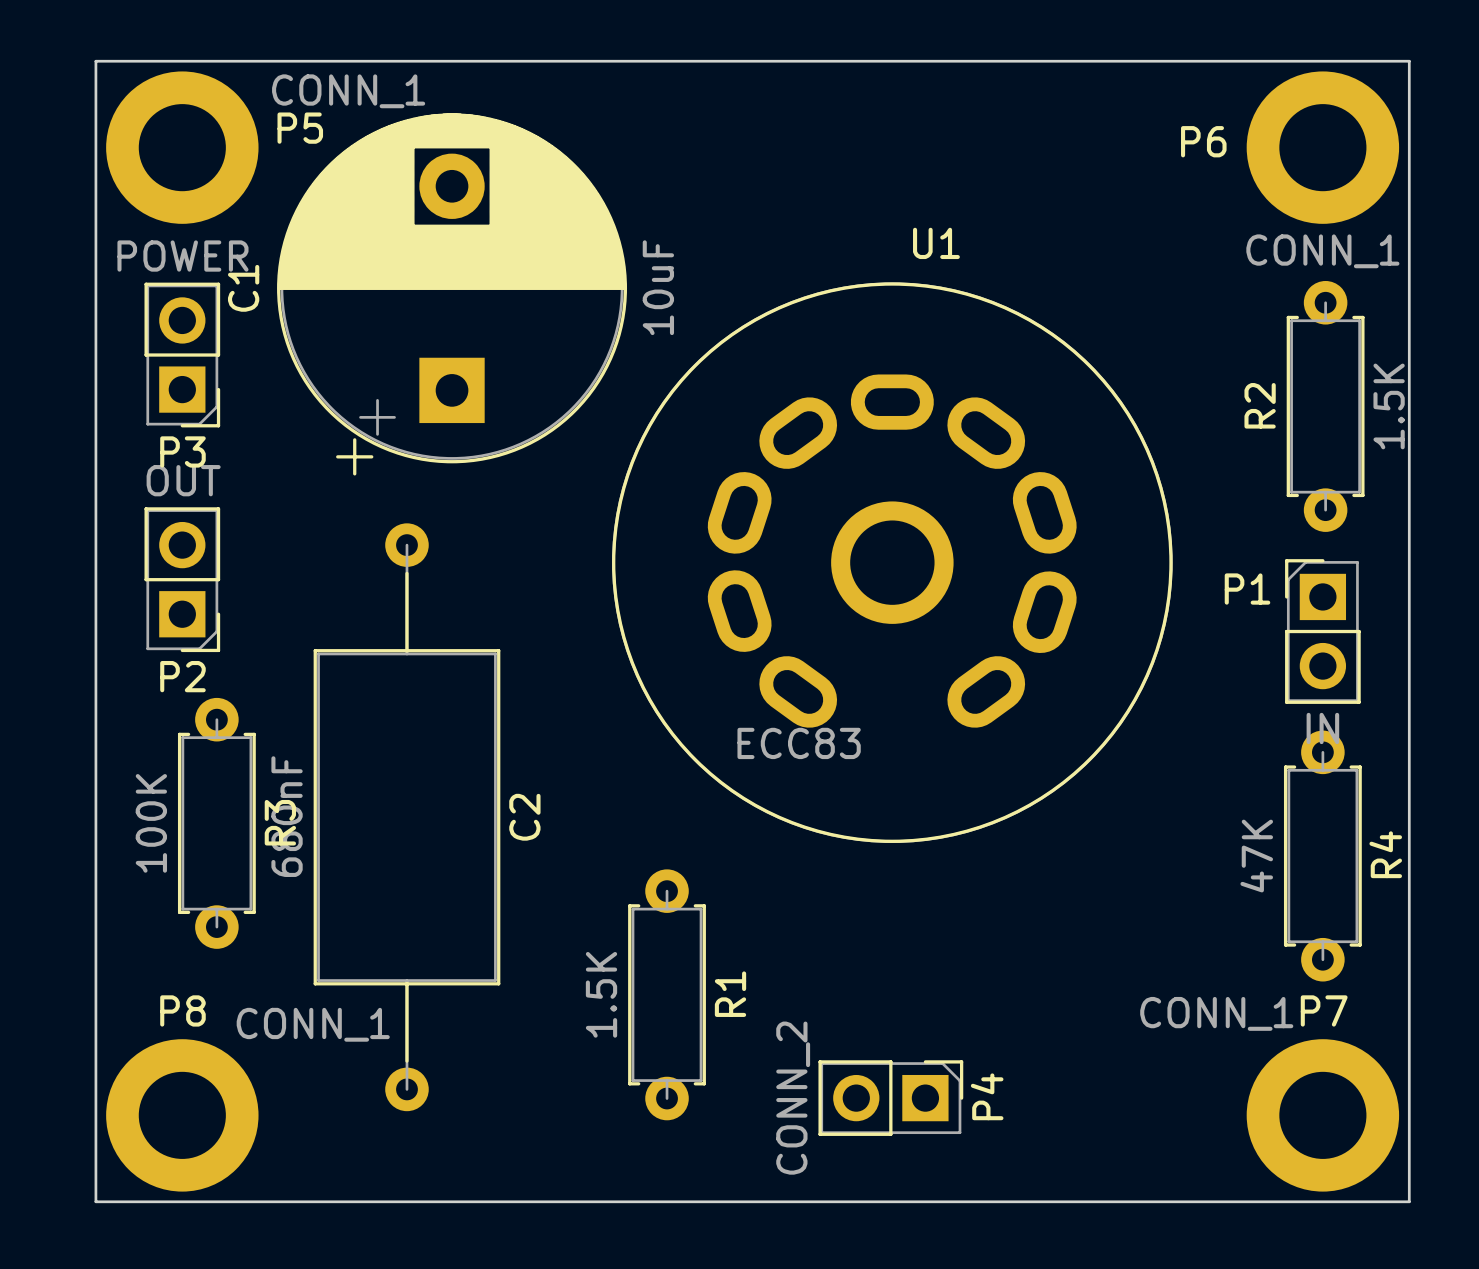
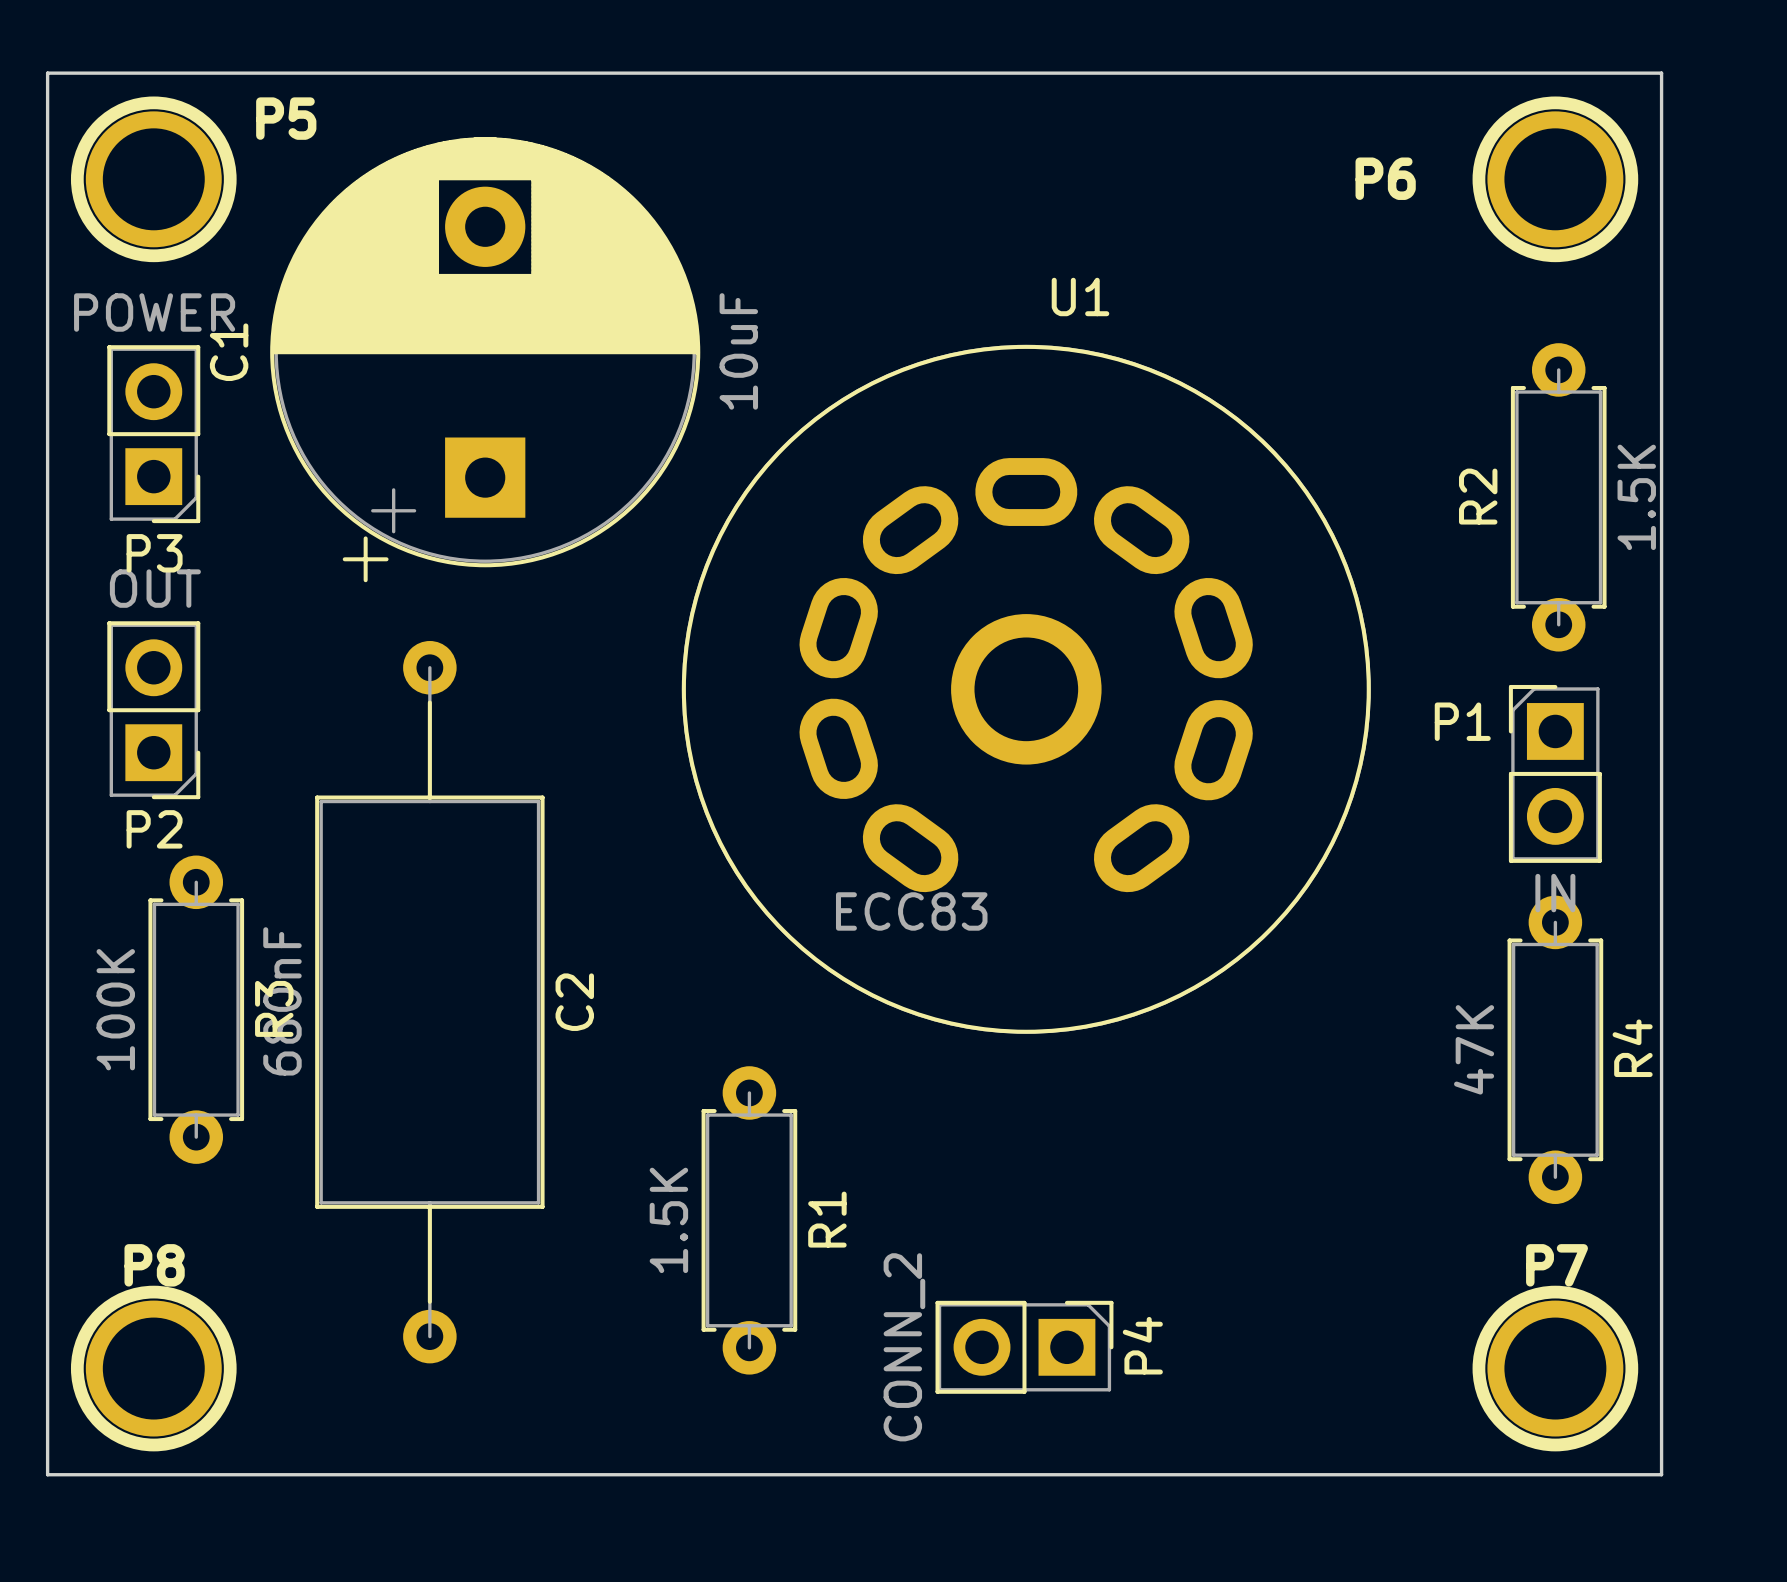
P5 footprint: [106, 71, 259, 224] -> [70, 96, 237, 263]
P6 footprint: [1246, 71, 1400, 224] -> [1472, 96, 1639, 263]
P5 value: CONN_1 (348, 91) -> none
P6 value: CONN_1 (1322, 251) -> none
P7 value: CONN_1 (1216, 1013) -> none
P8 value: CONN_1 (313, 1024) -> none
P8 footprint: [106, 1039, 259, 1192] -> [70, 1285, 237, 1452]
P7 footprint: [1246, 1039, 1400, 1192] -> [1472, 1285, 1639, 1452]

